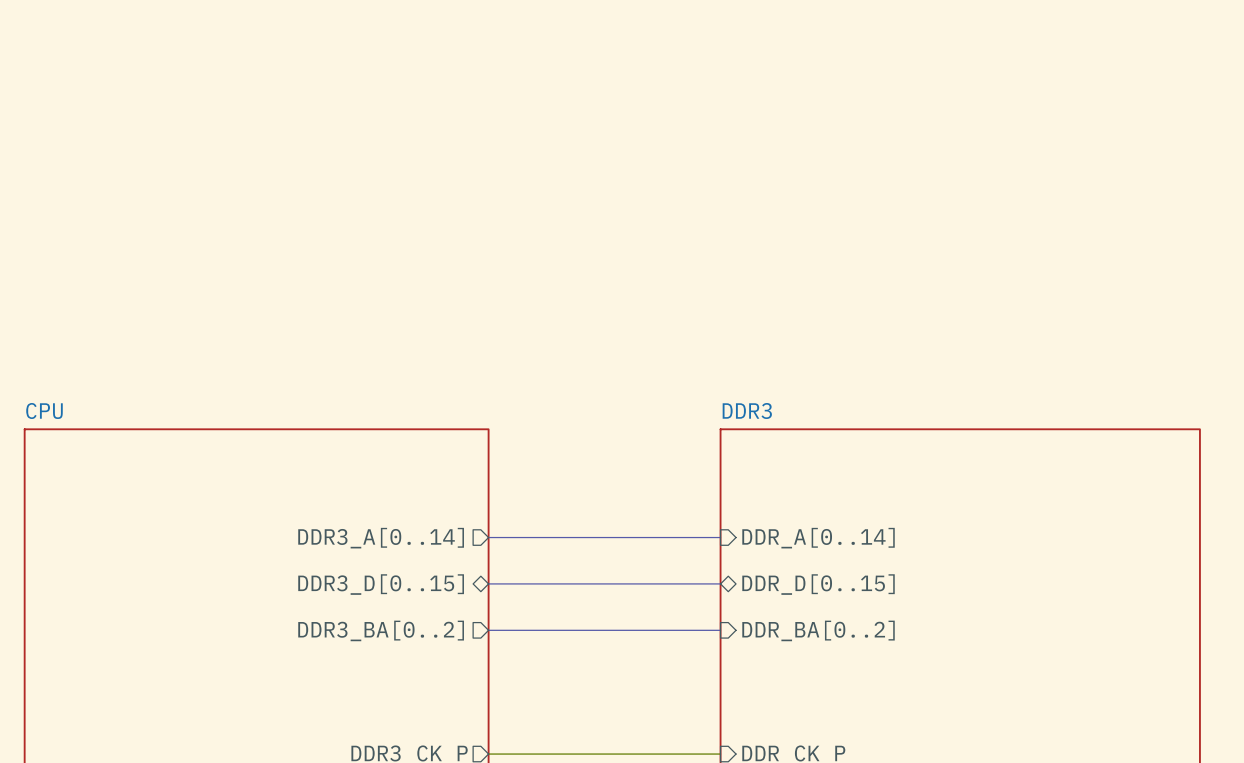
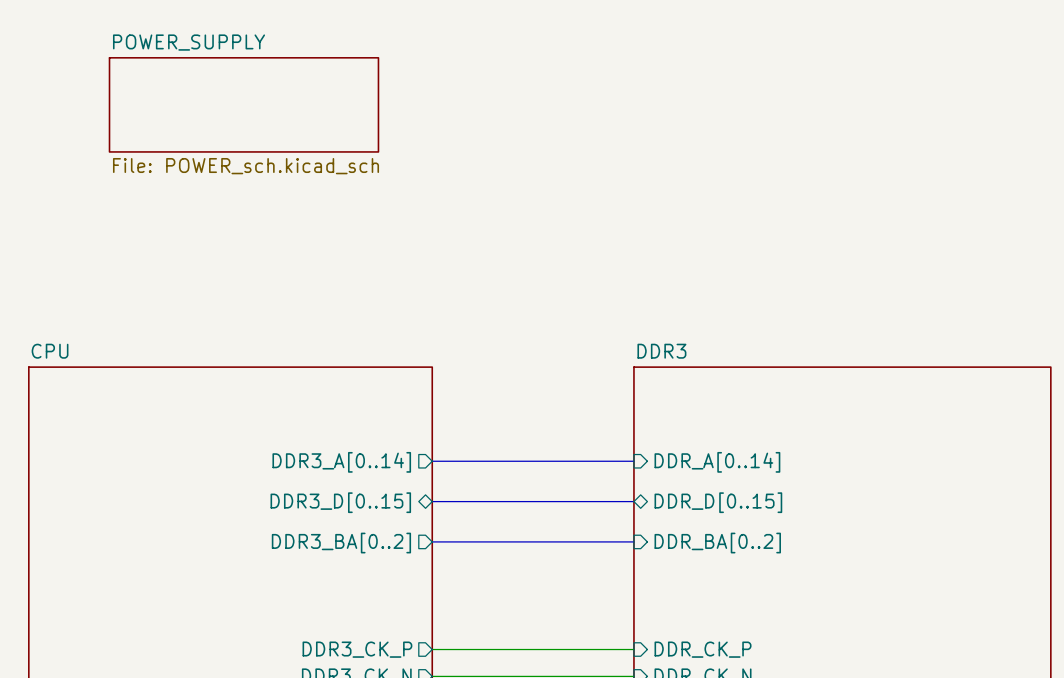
sheet POWER_SUPPLY: none -> File: POWER_sch.kicad_sch (243, 104)

